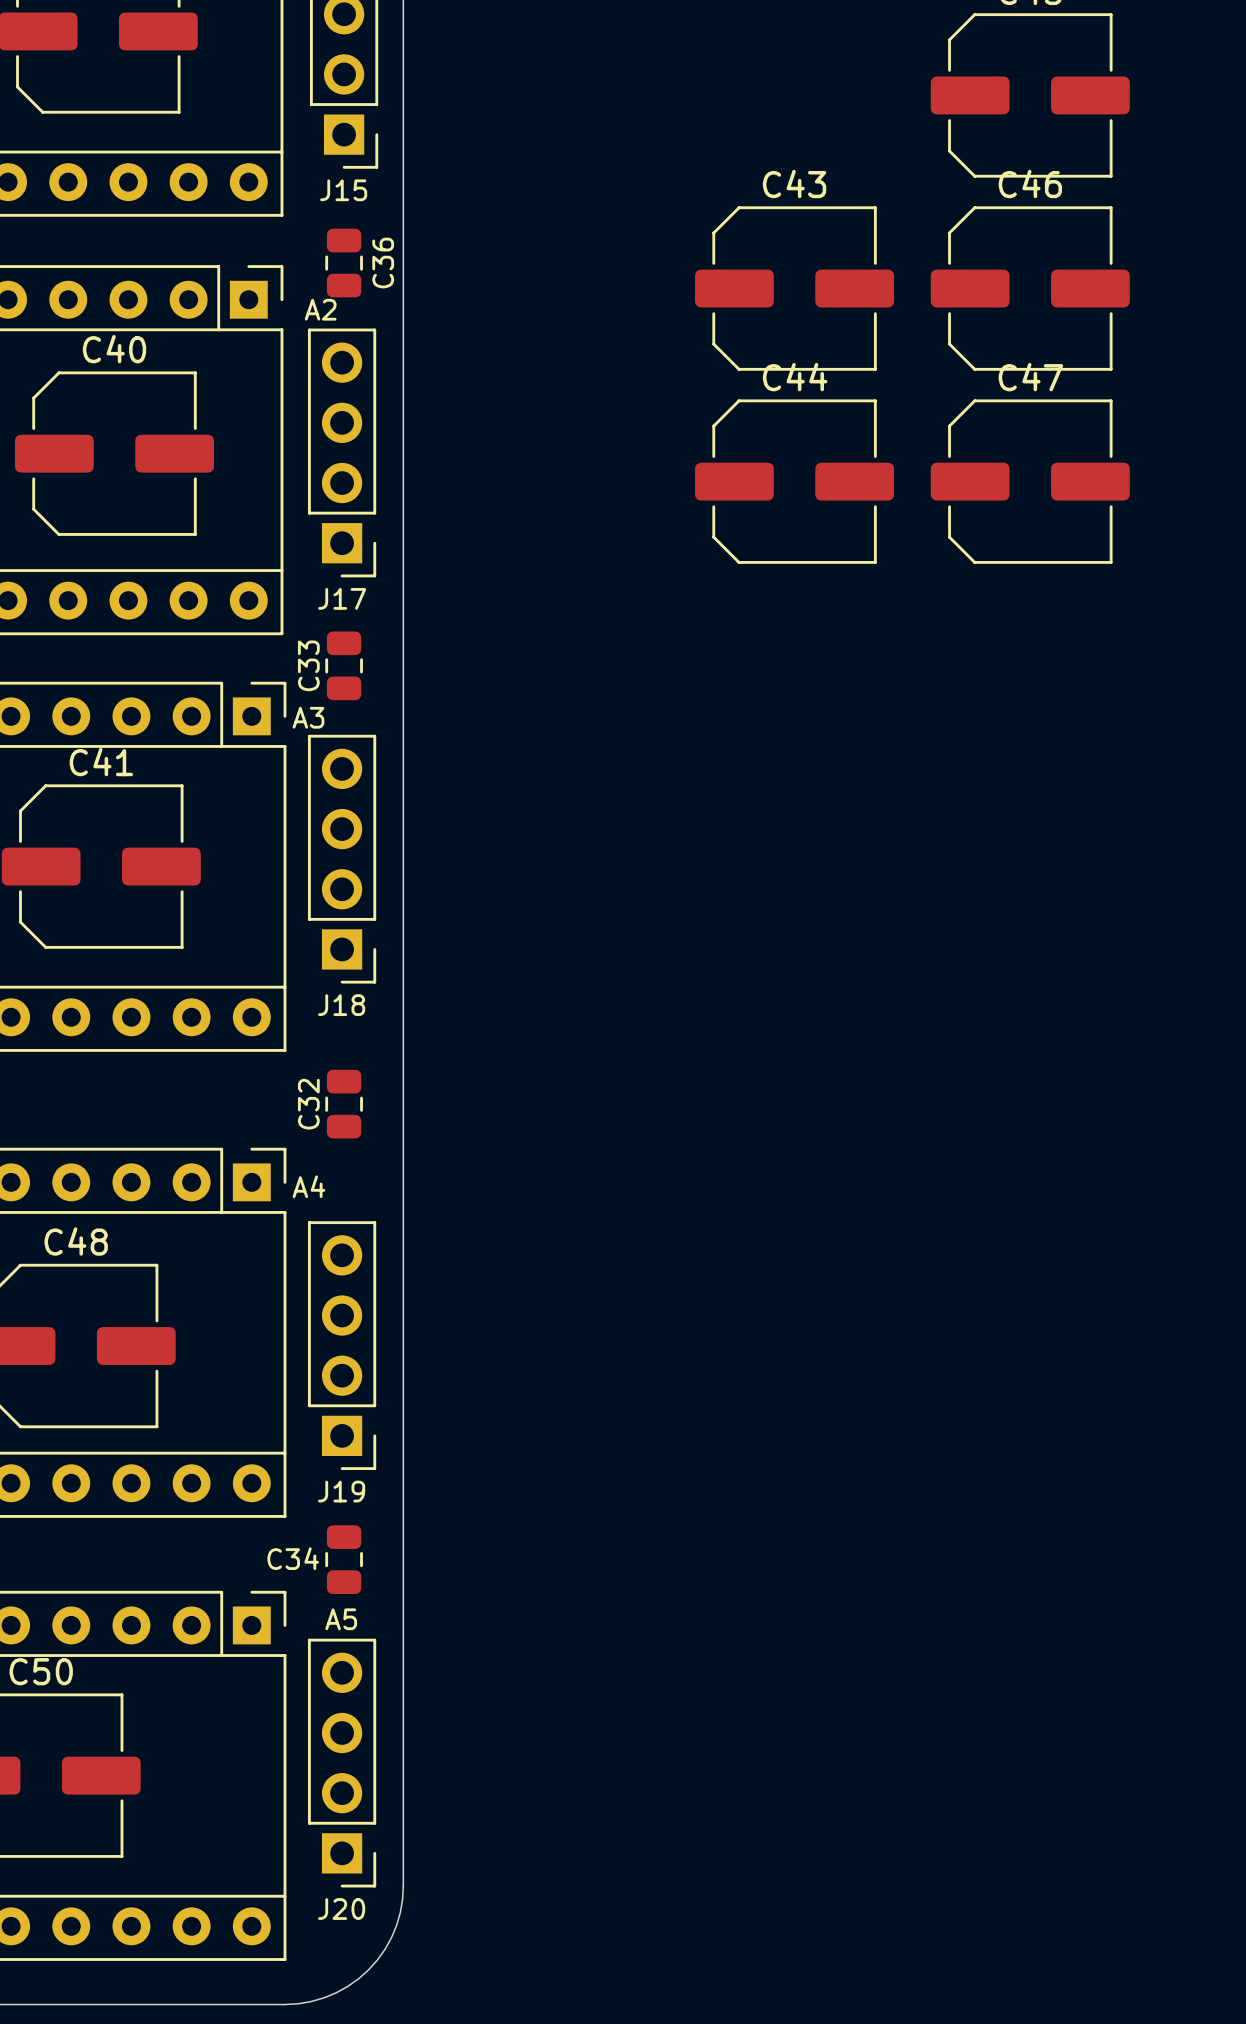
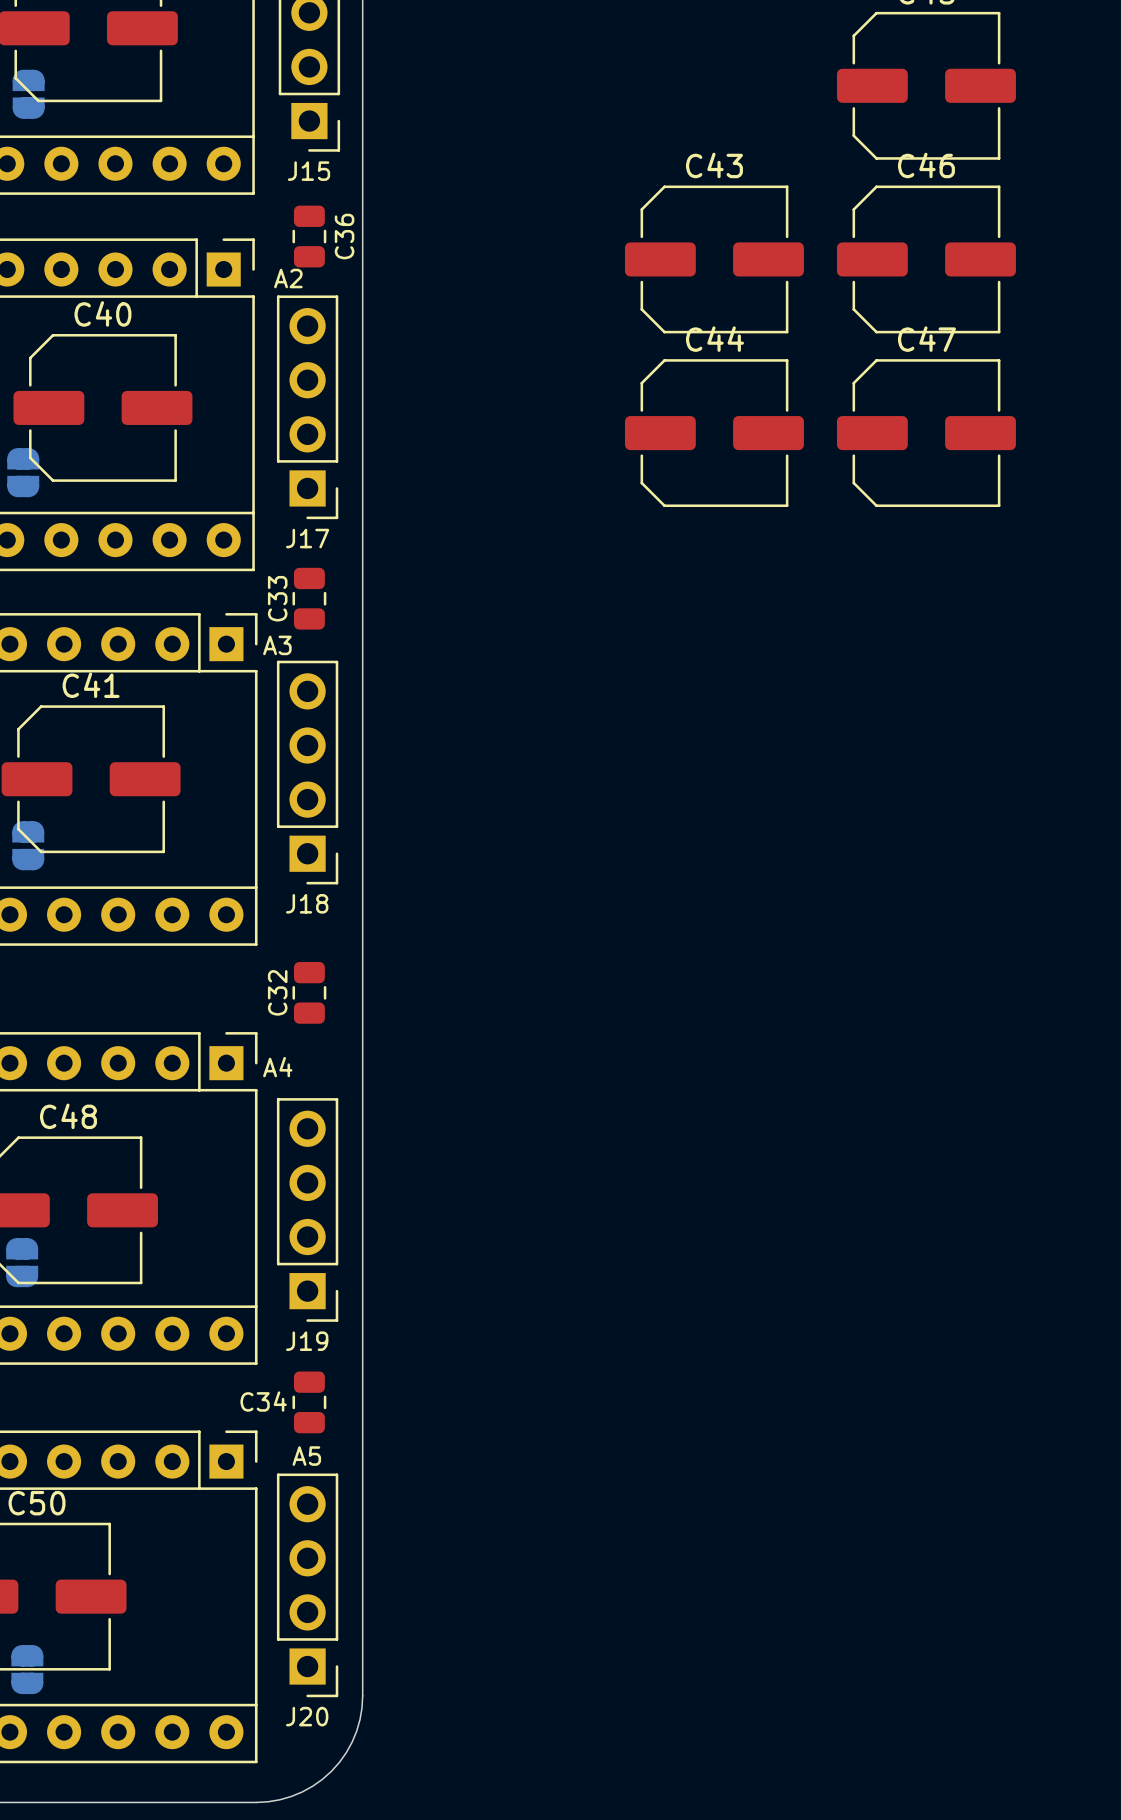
part: none -> (28, 94)
part: none -> (23, 472)
part: none -> (28, 845)
part: none -> (22, 1262)
part: none -> (27, 1669)

